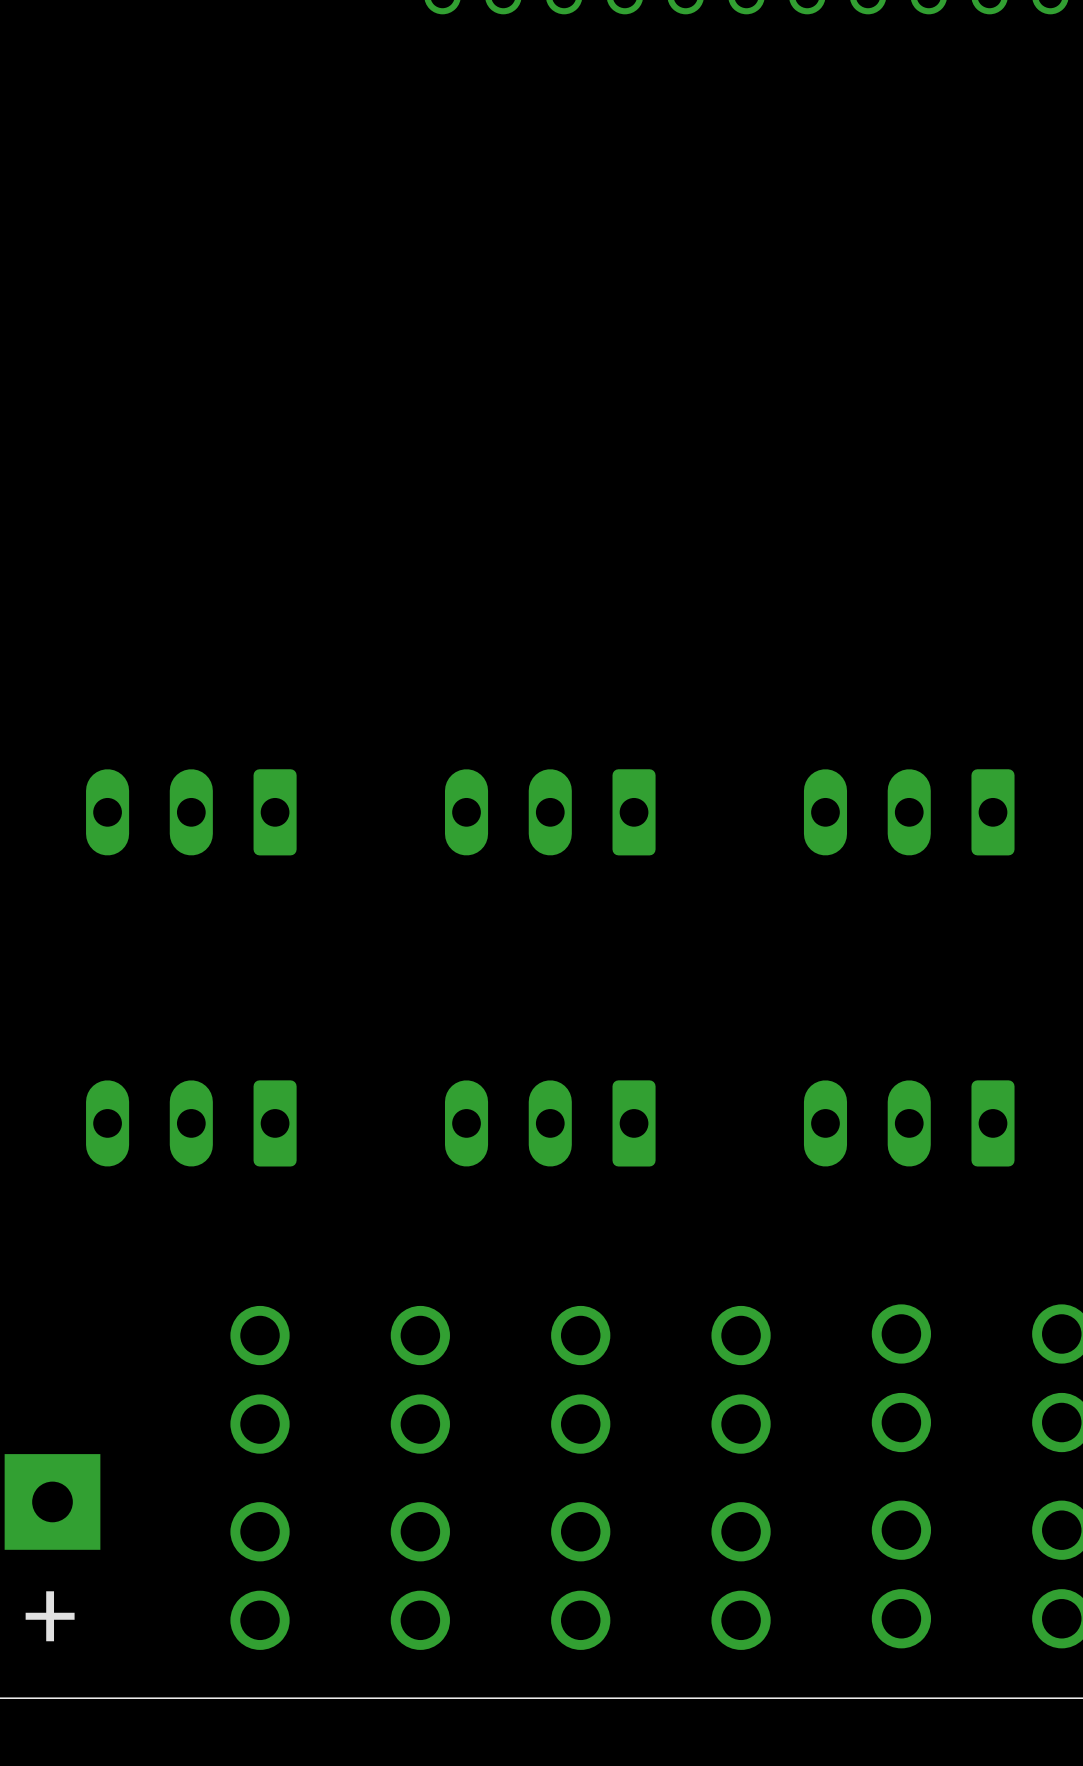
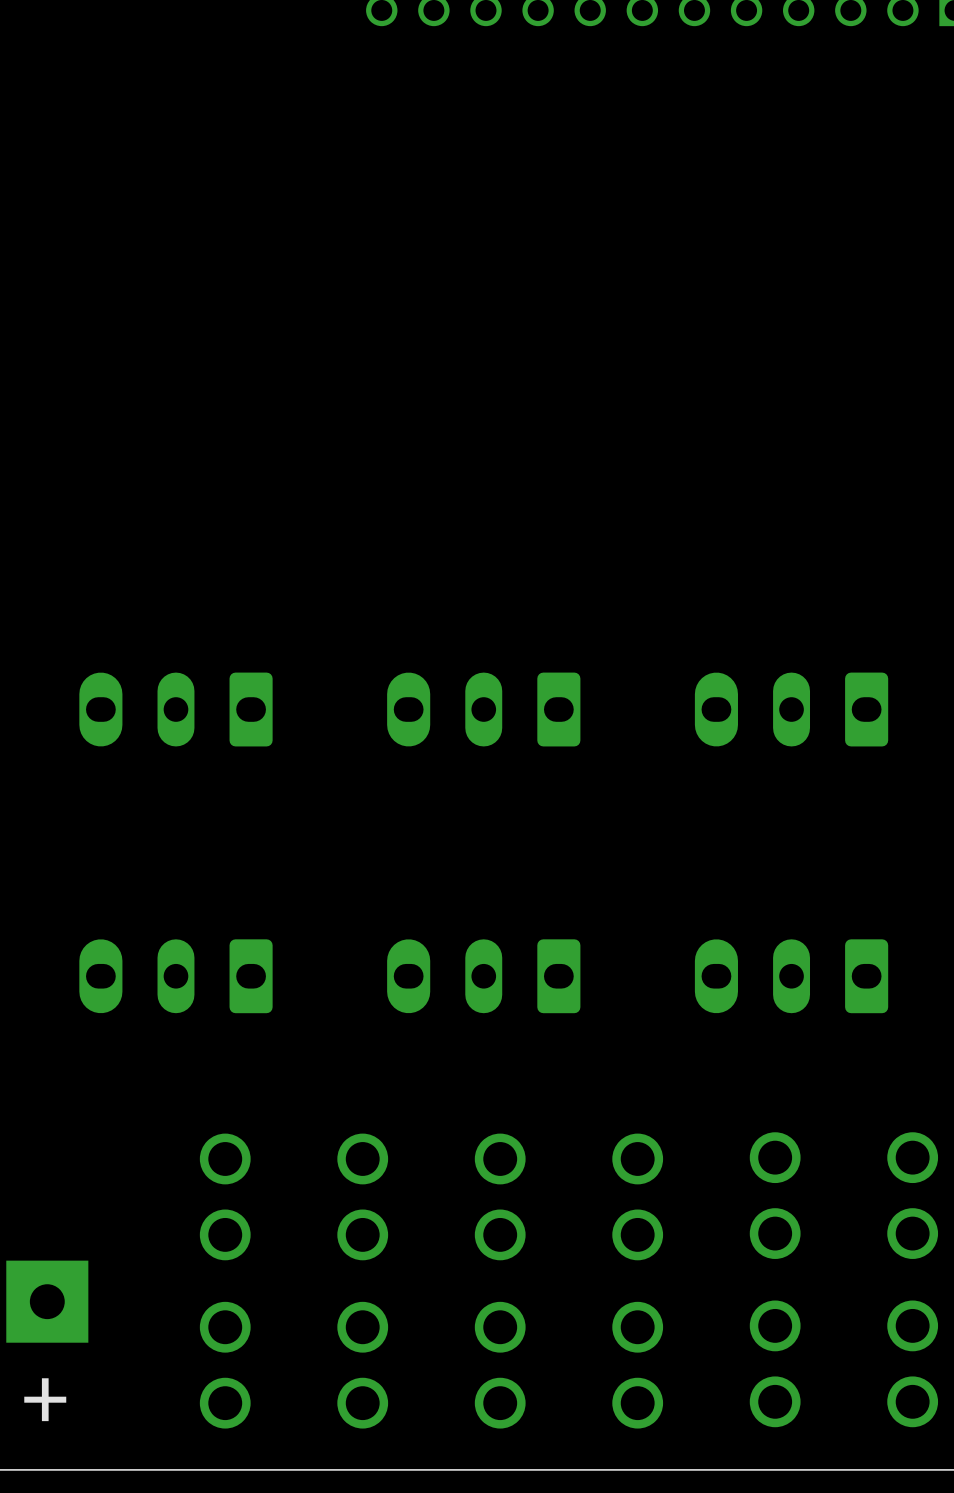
part footprint: [86, 769, 297, 856] -> [79, 672, 273, 747]
part footprint: [444, 769, 656, 856] -> [387, 672, 581, 747]
part footprint: [803, 769, 1015, 856] -> [694, 672, 889, 747]
part footprint: [86, 1080, 297, 1167] -> [79, 939, 273, 1014]
part footprint: [444, 1080, 656, 1167] -> [387, 939, 581, 1014]
part footprint: [803, 1080, 1015, 1167] -> [694, 939, 889, 1014]

